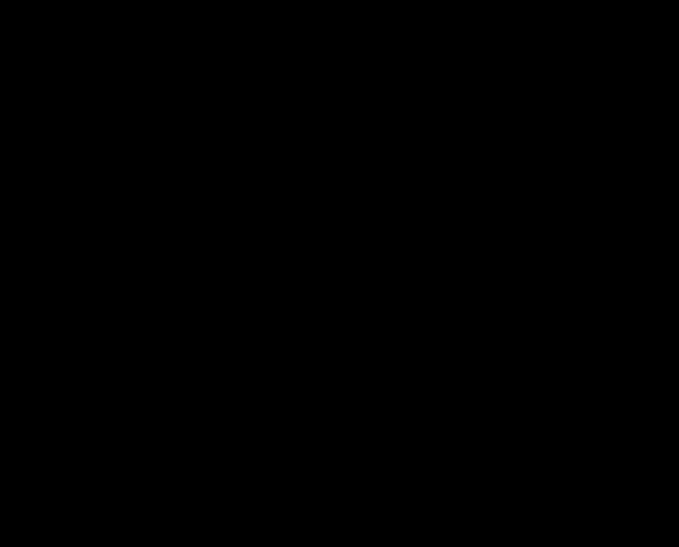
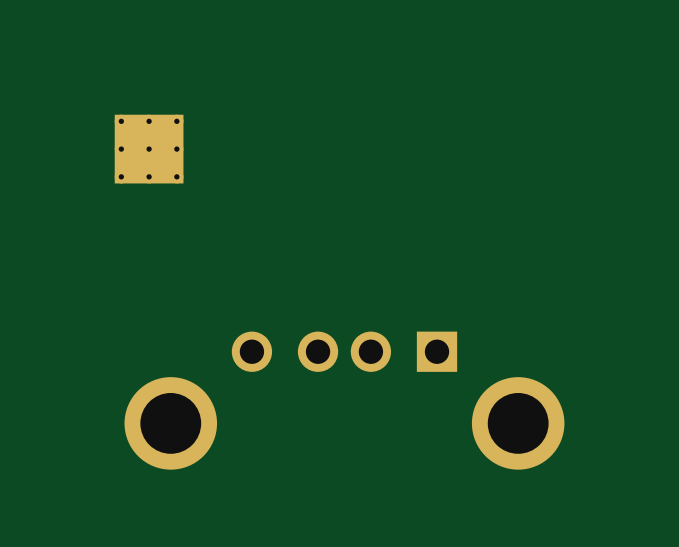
part: none -> (149, 149)
part: none -> (344, 400)

